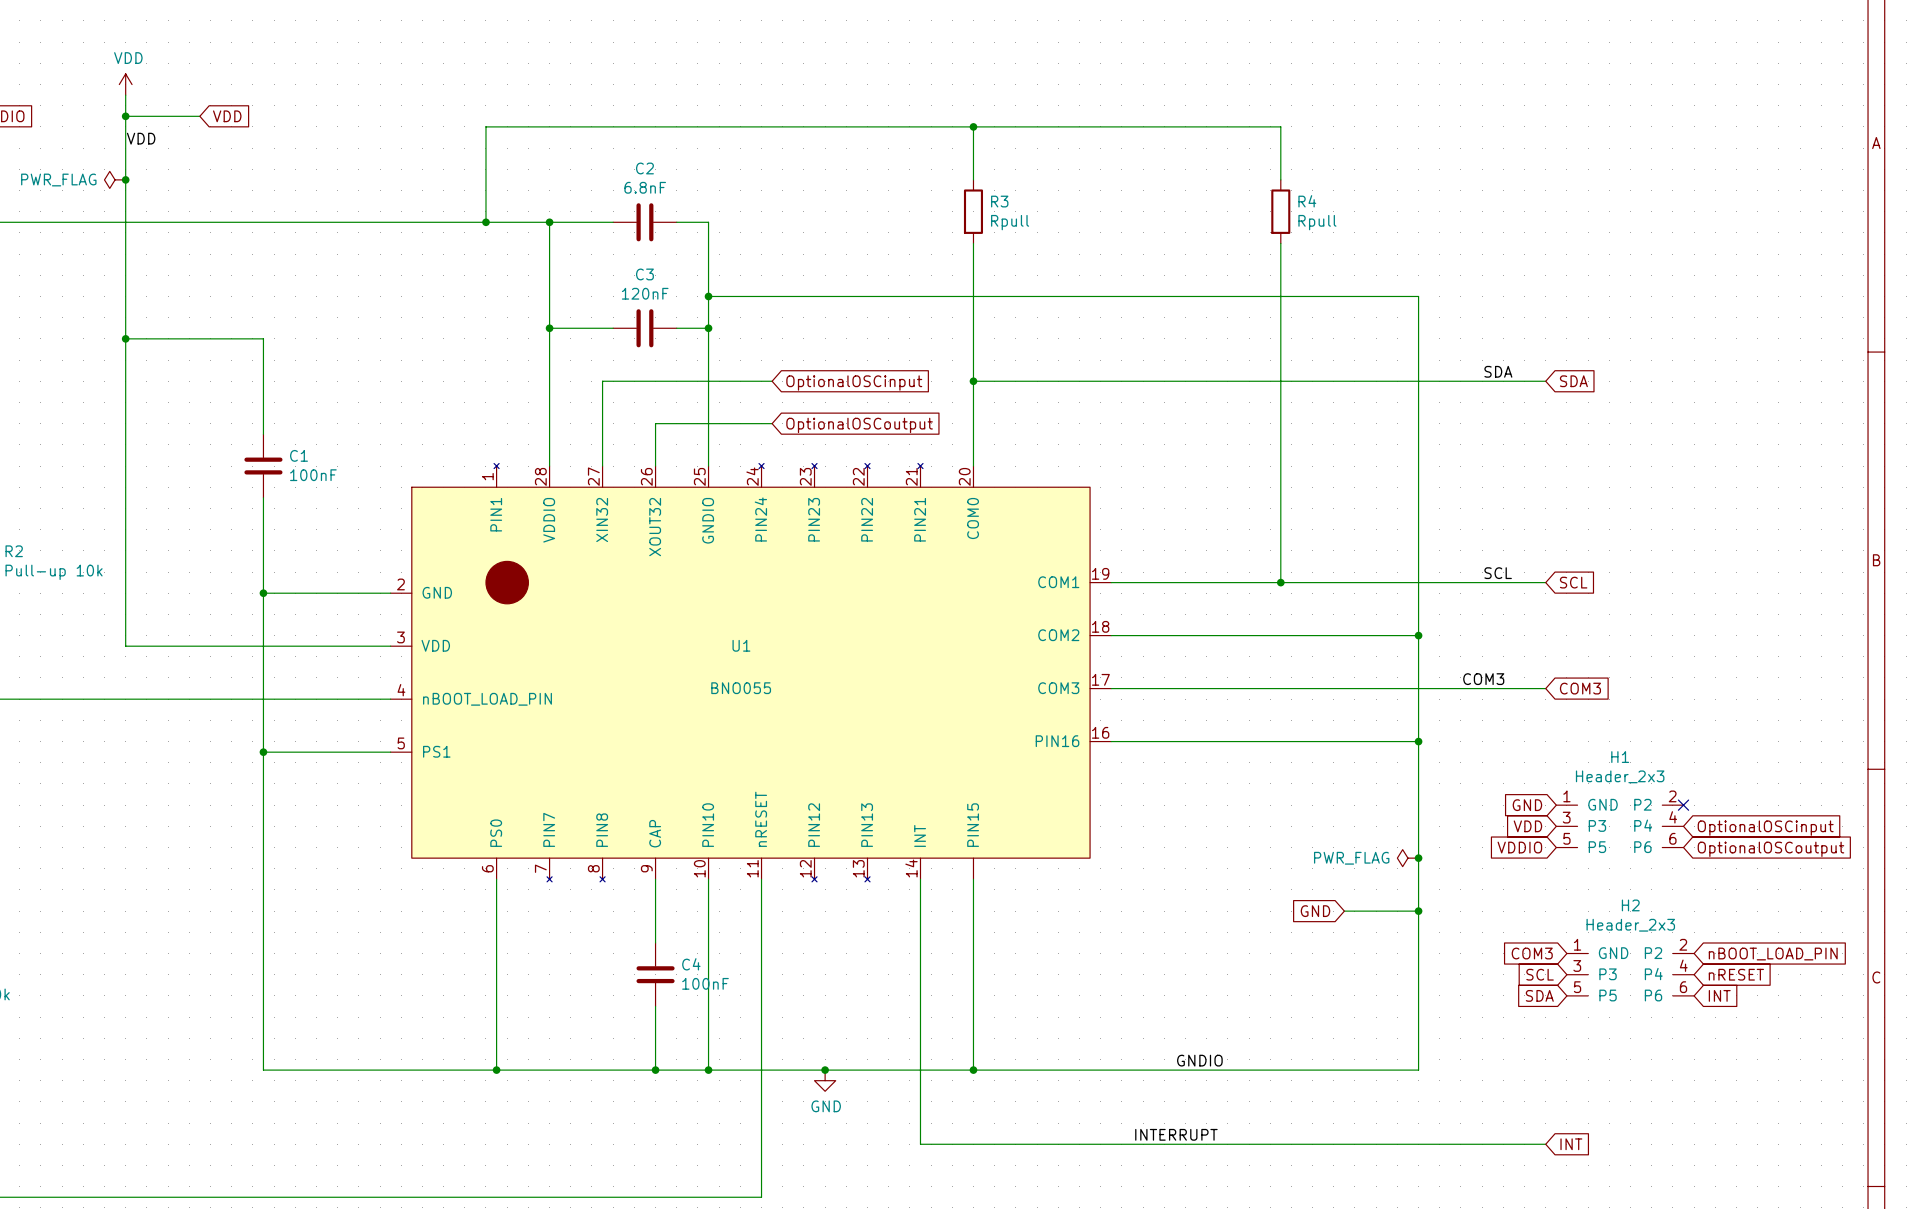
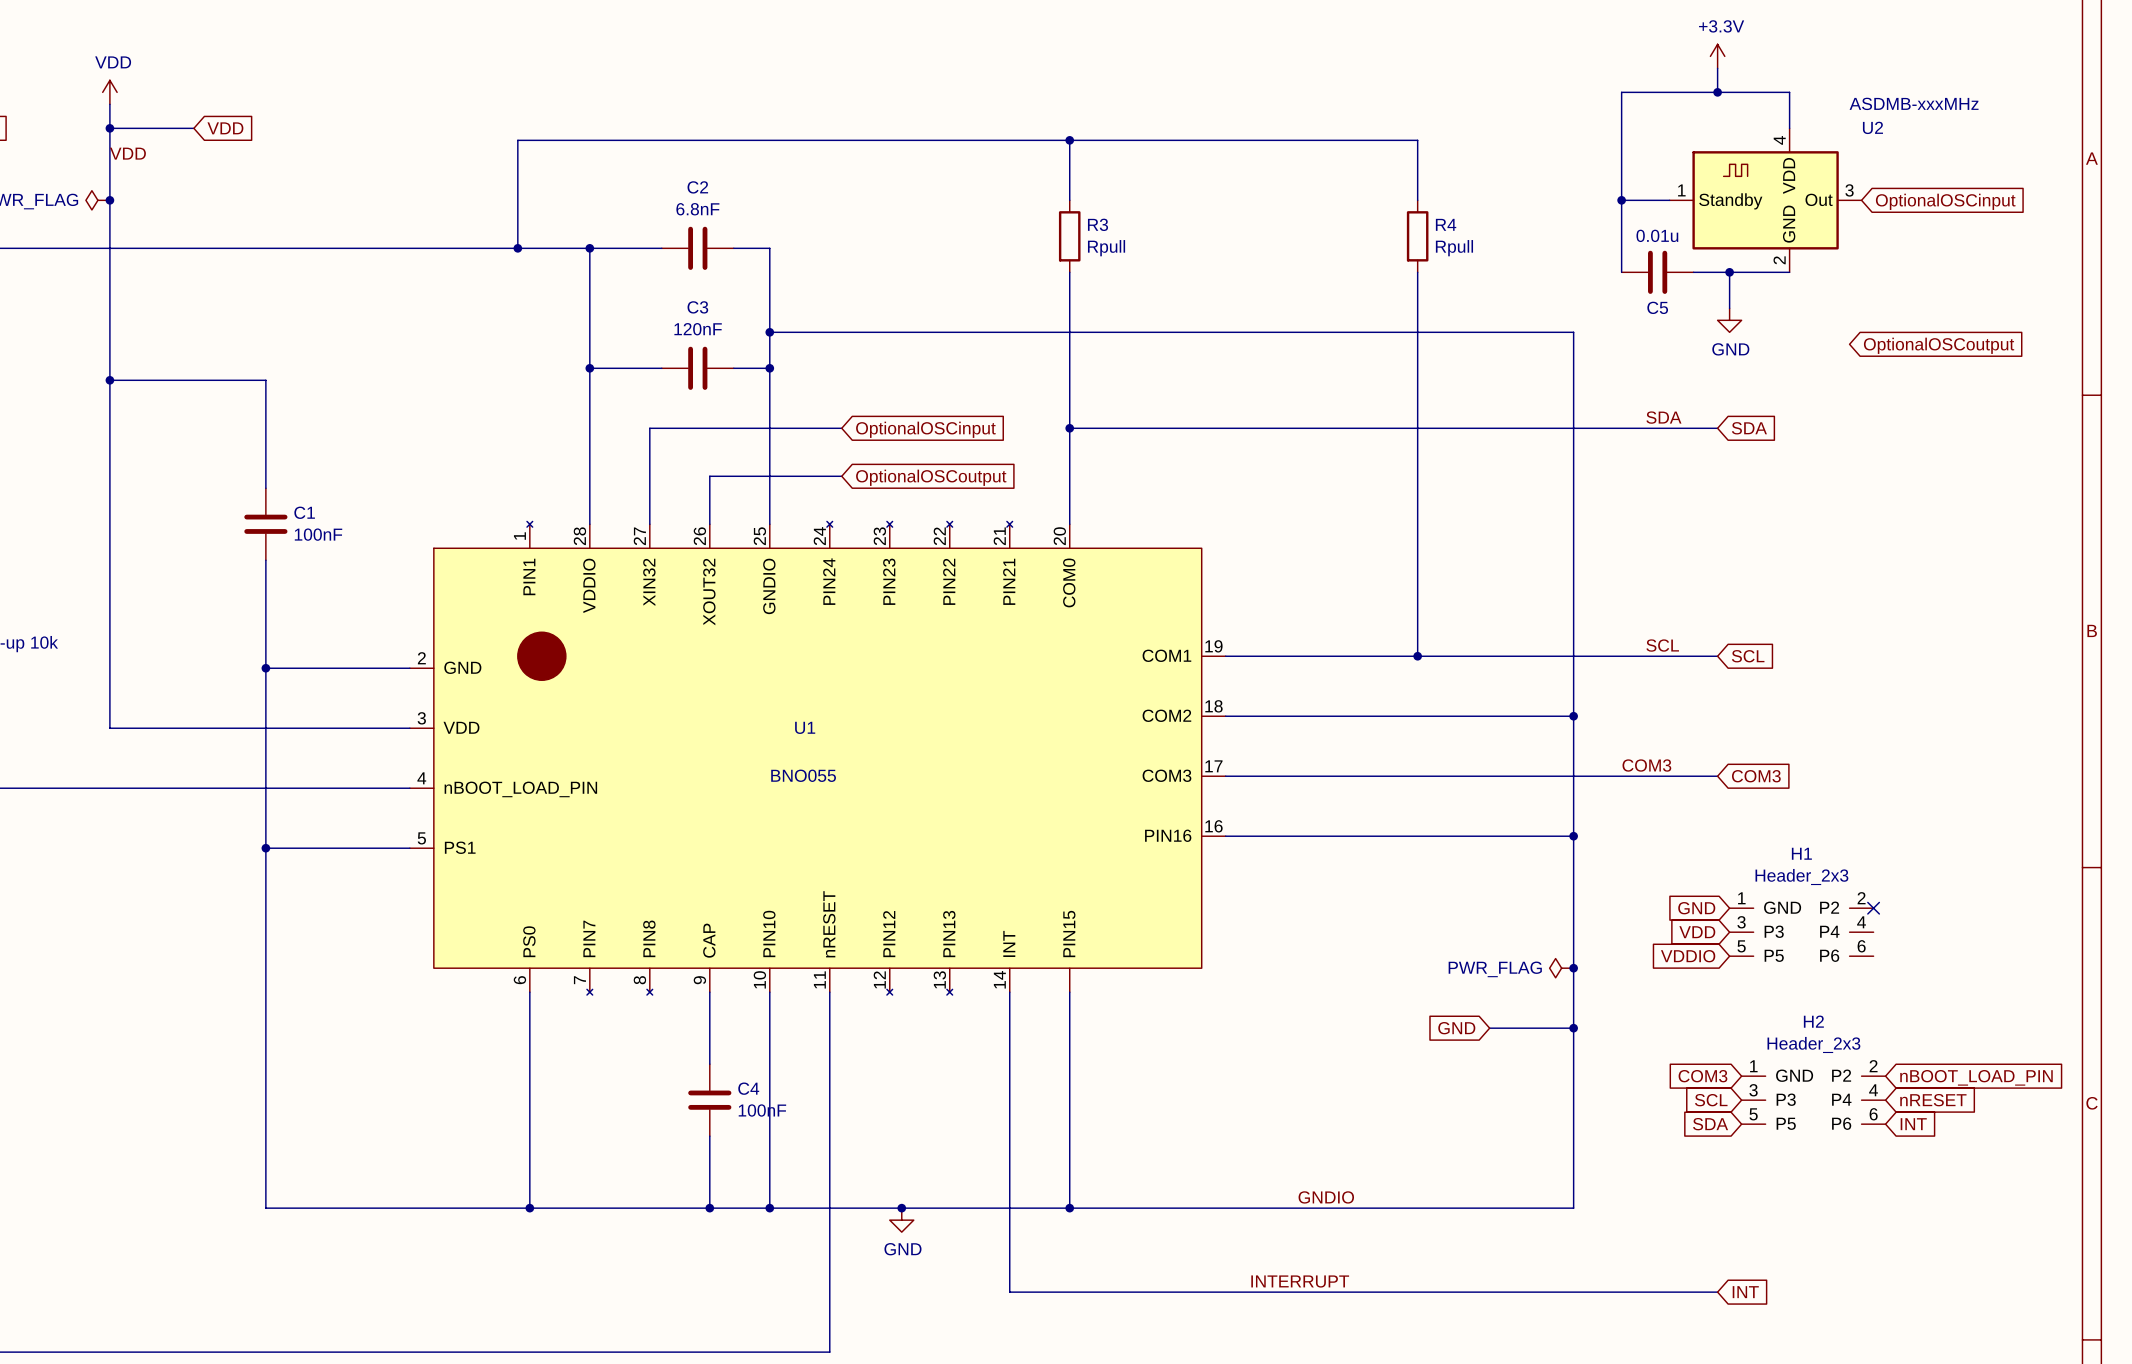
power symbol: none -> +3.3V (1717, 56)
wire: none -> (1717, 68) (1717, 92)
junction: none -> (1717, 92)
wire: none -> (1789, 128) (1789, 92) (1621, 92) (1621, 272)
wire: none -> (1621, 200) (1669, 200)
junction: none -> (1621, 200)
U2: none -> ASDMB-xxxMHz (1765, 200)
global label: none -> OptionalOSCinput (1945, 201)
C5: none -> 0.01u (1657, 272)
wire: none -> (1693, 272) (1789, 272)
wire: none -> (1729, 272) (1729, 308)
junction: none -> (1729, 272)
power symbol: none -> GND (1729, 320)
global label: none -> OptionalOSCoutput (1939, 345)
global label: OptionalOSCinput (1765, 828) -> none
global label: OptionalOSCoutput (1770, 849) -> none

